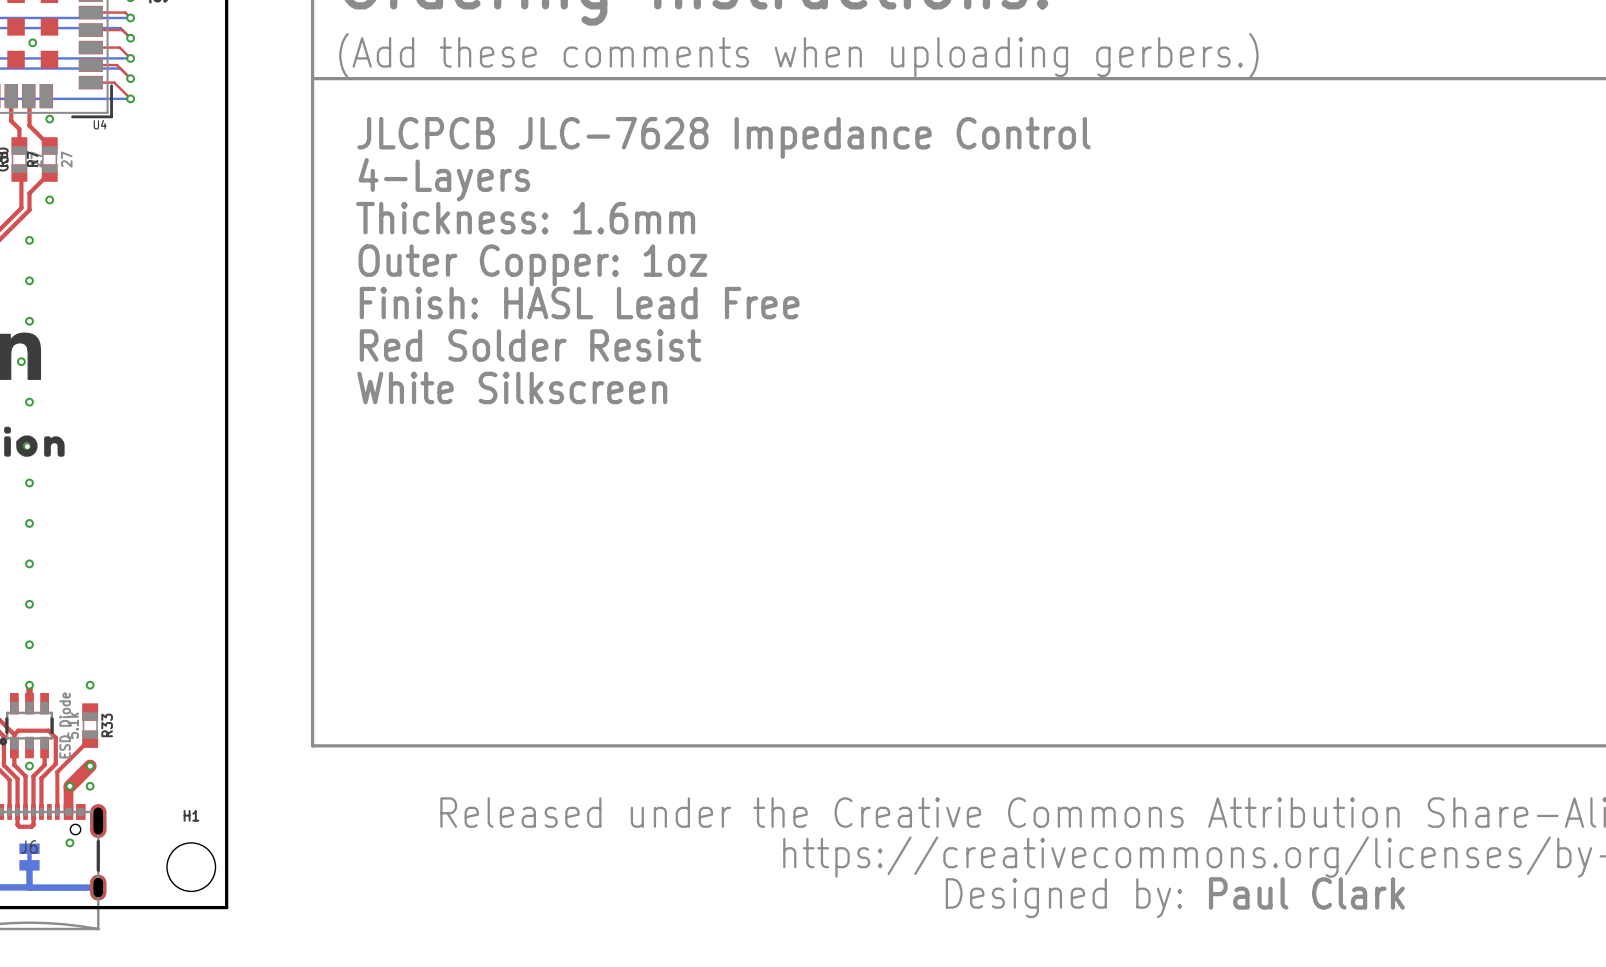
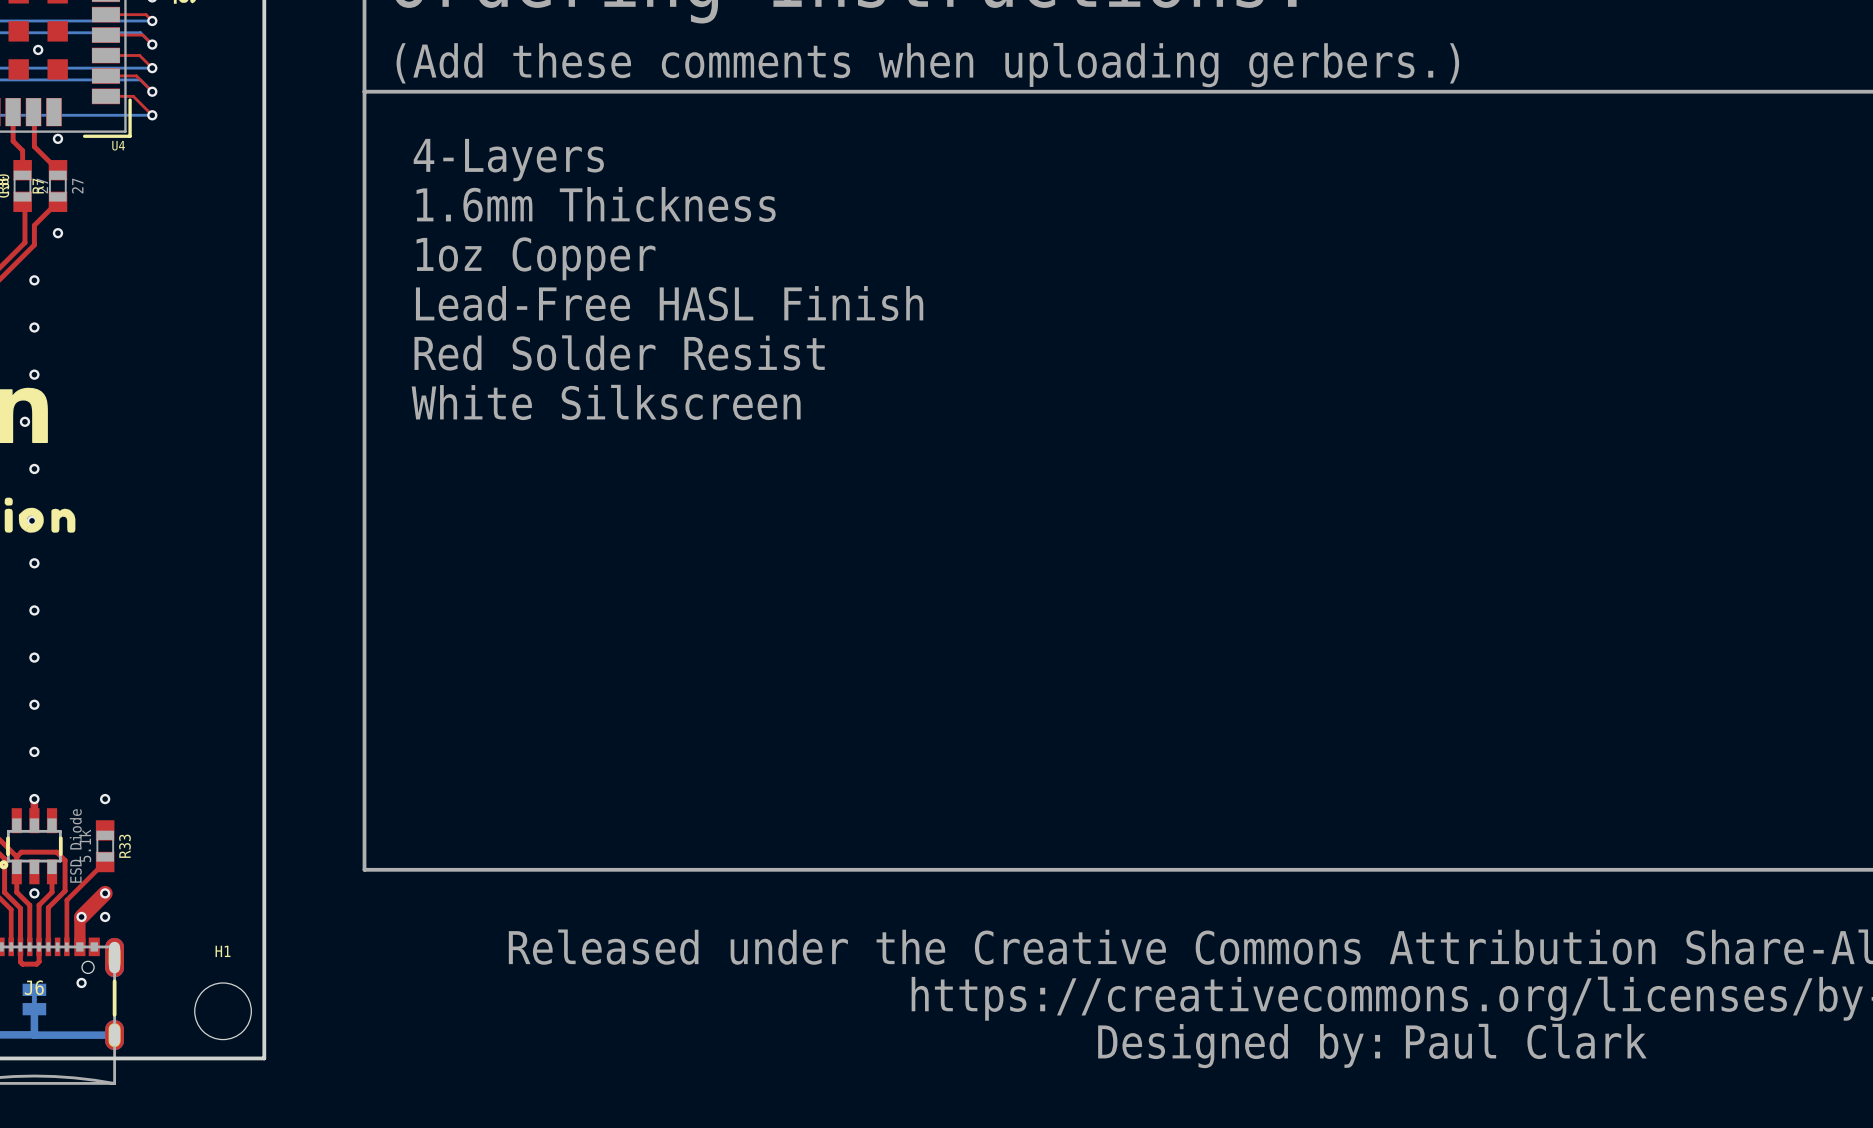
text: JLCPCB JLC-7628 Impedance Control (723, 137) -> 4-Layers (508, 160)
text: 4-Layers (444, 179) -> 1.6mm Thickness (596, 204)
text: Thickness: 1.6mm (525, 218) -> 1oz Copper (536, 258)
text: Outer Copper: 1oz (532, 265) -> Lead-Free HASL Finish (669, 303)
text: Finish: HASL Lead Free (579, 303) -> Red Solder Resist (619, 352)
text: Red Solder Resist (530, 345) -> White Silkscreen (606, 402)
text: White Silkscreen (512, 387) -> none

